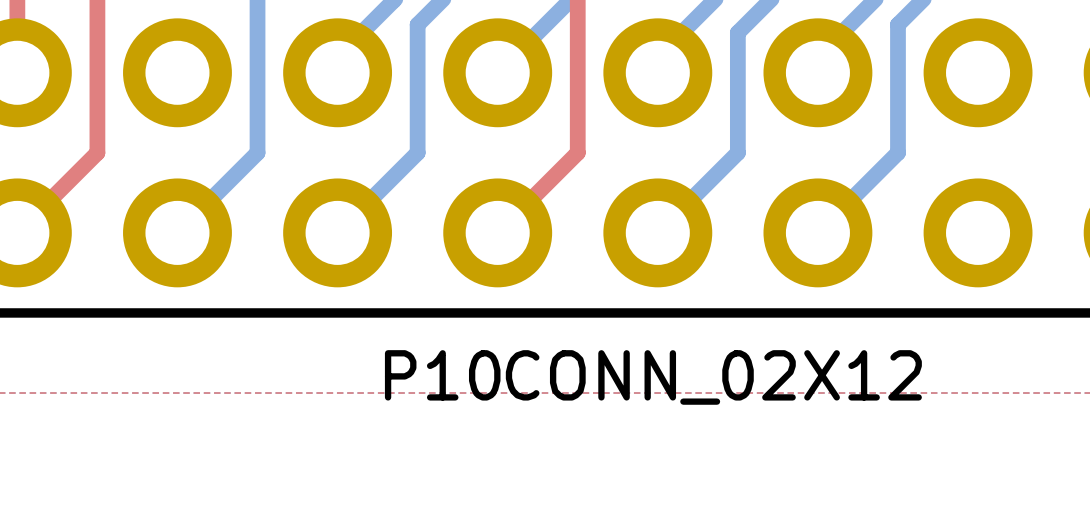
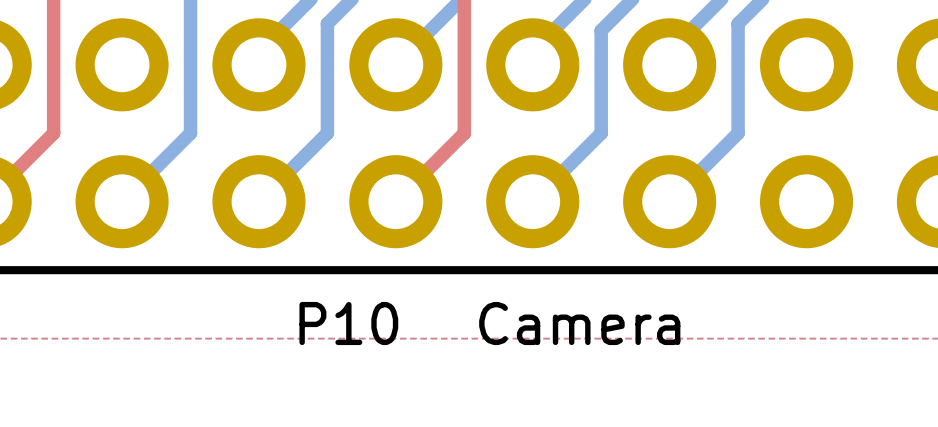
P10 value: CONN_02X12 (713, 377) -> Camera (579, 323)

